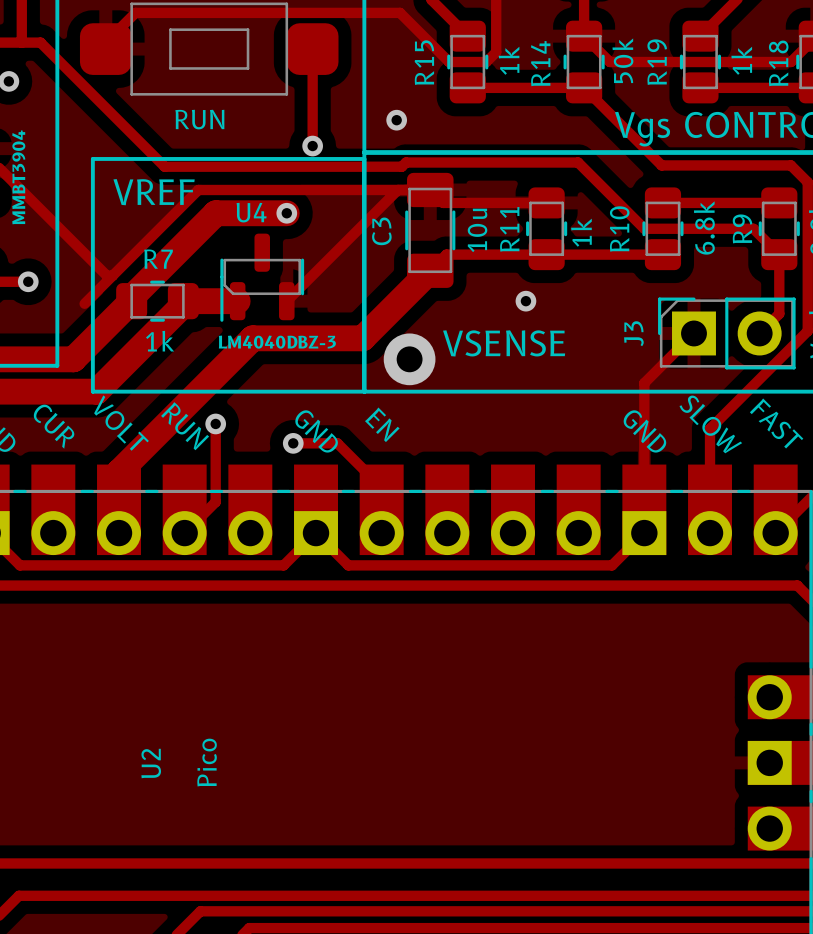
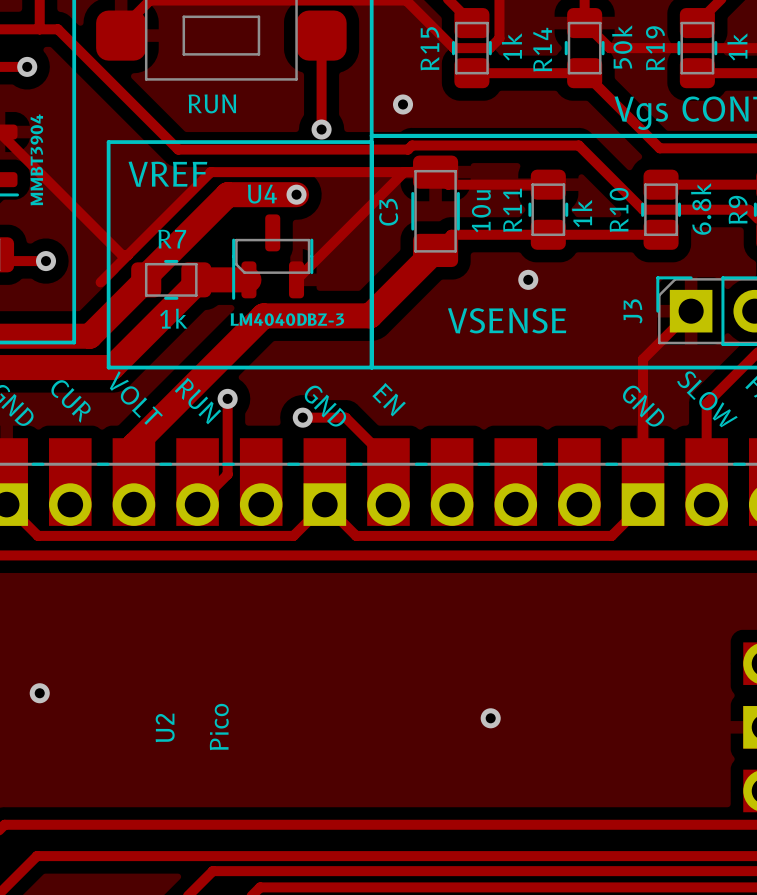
via: (409, 359) -> none
via: none -> (39, 693)
via: none -> (490, 718)

